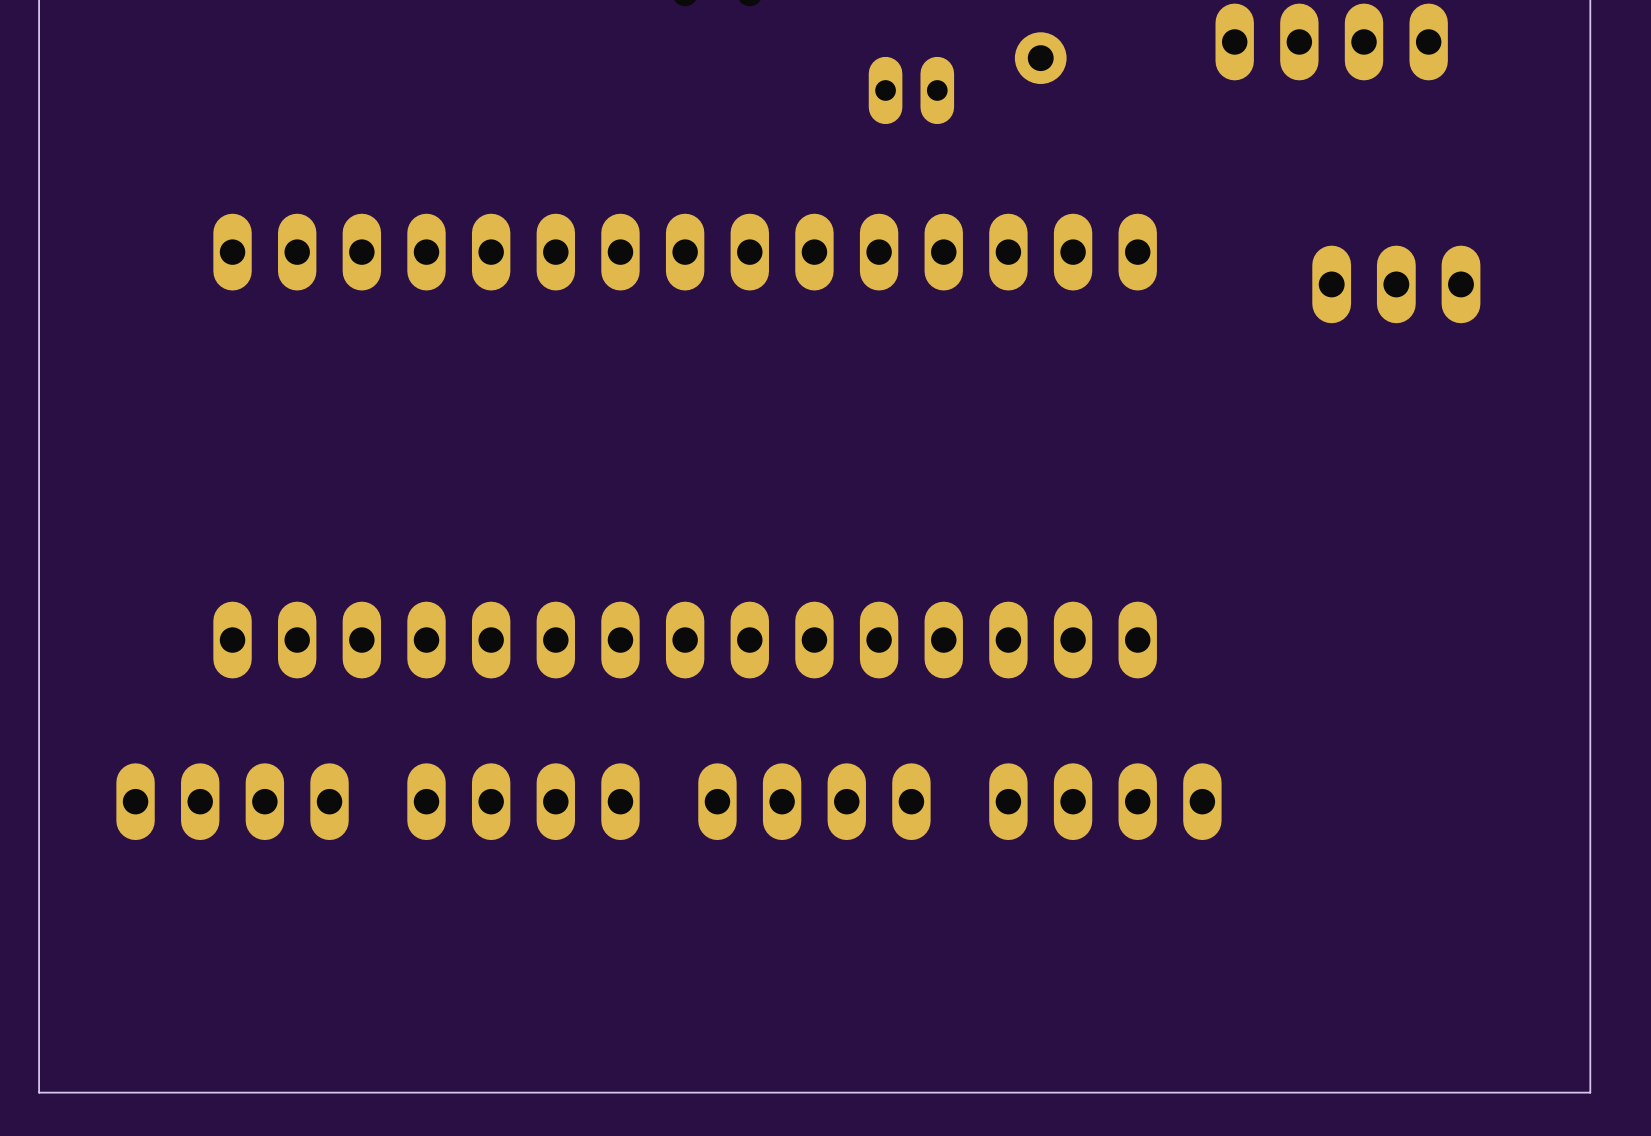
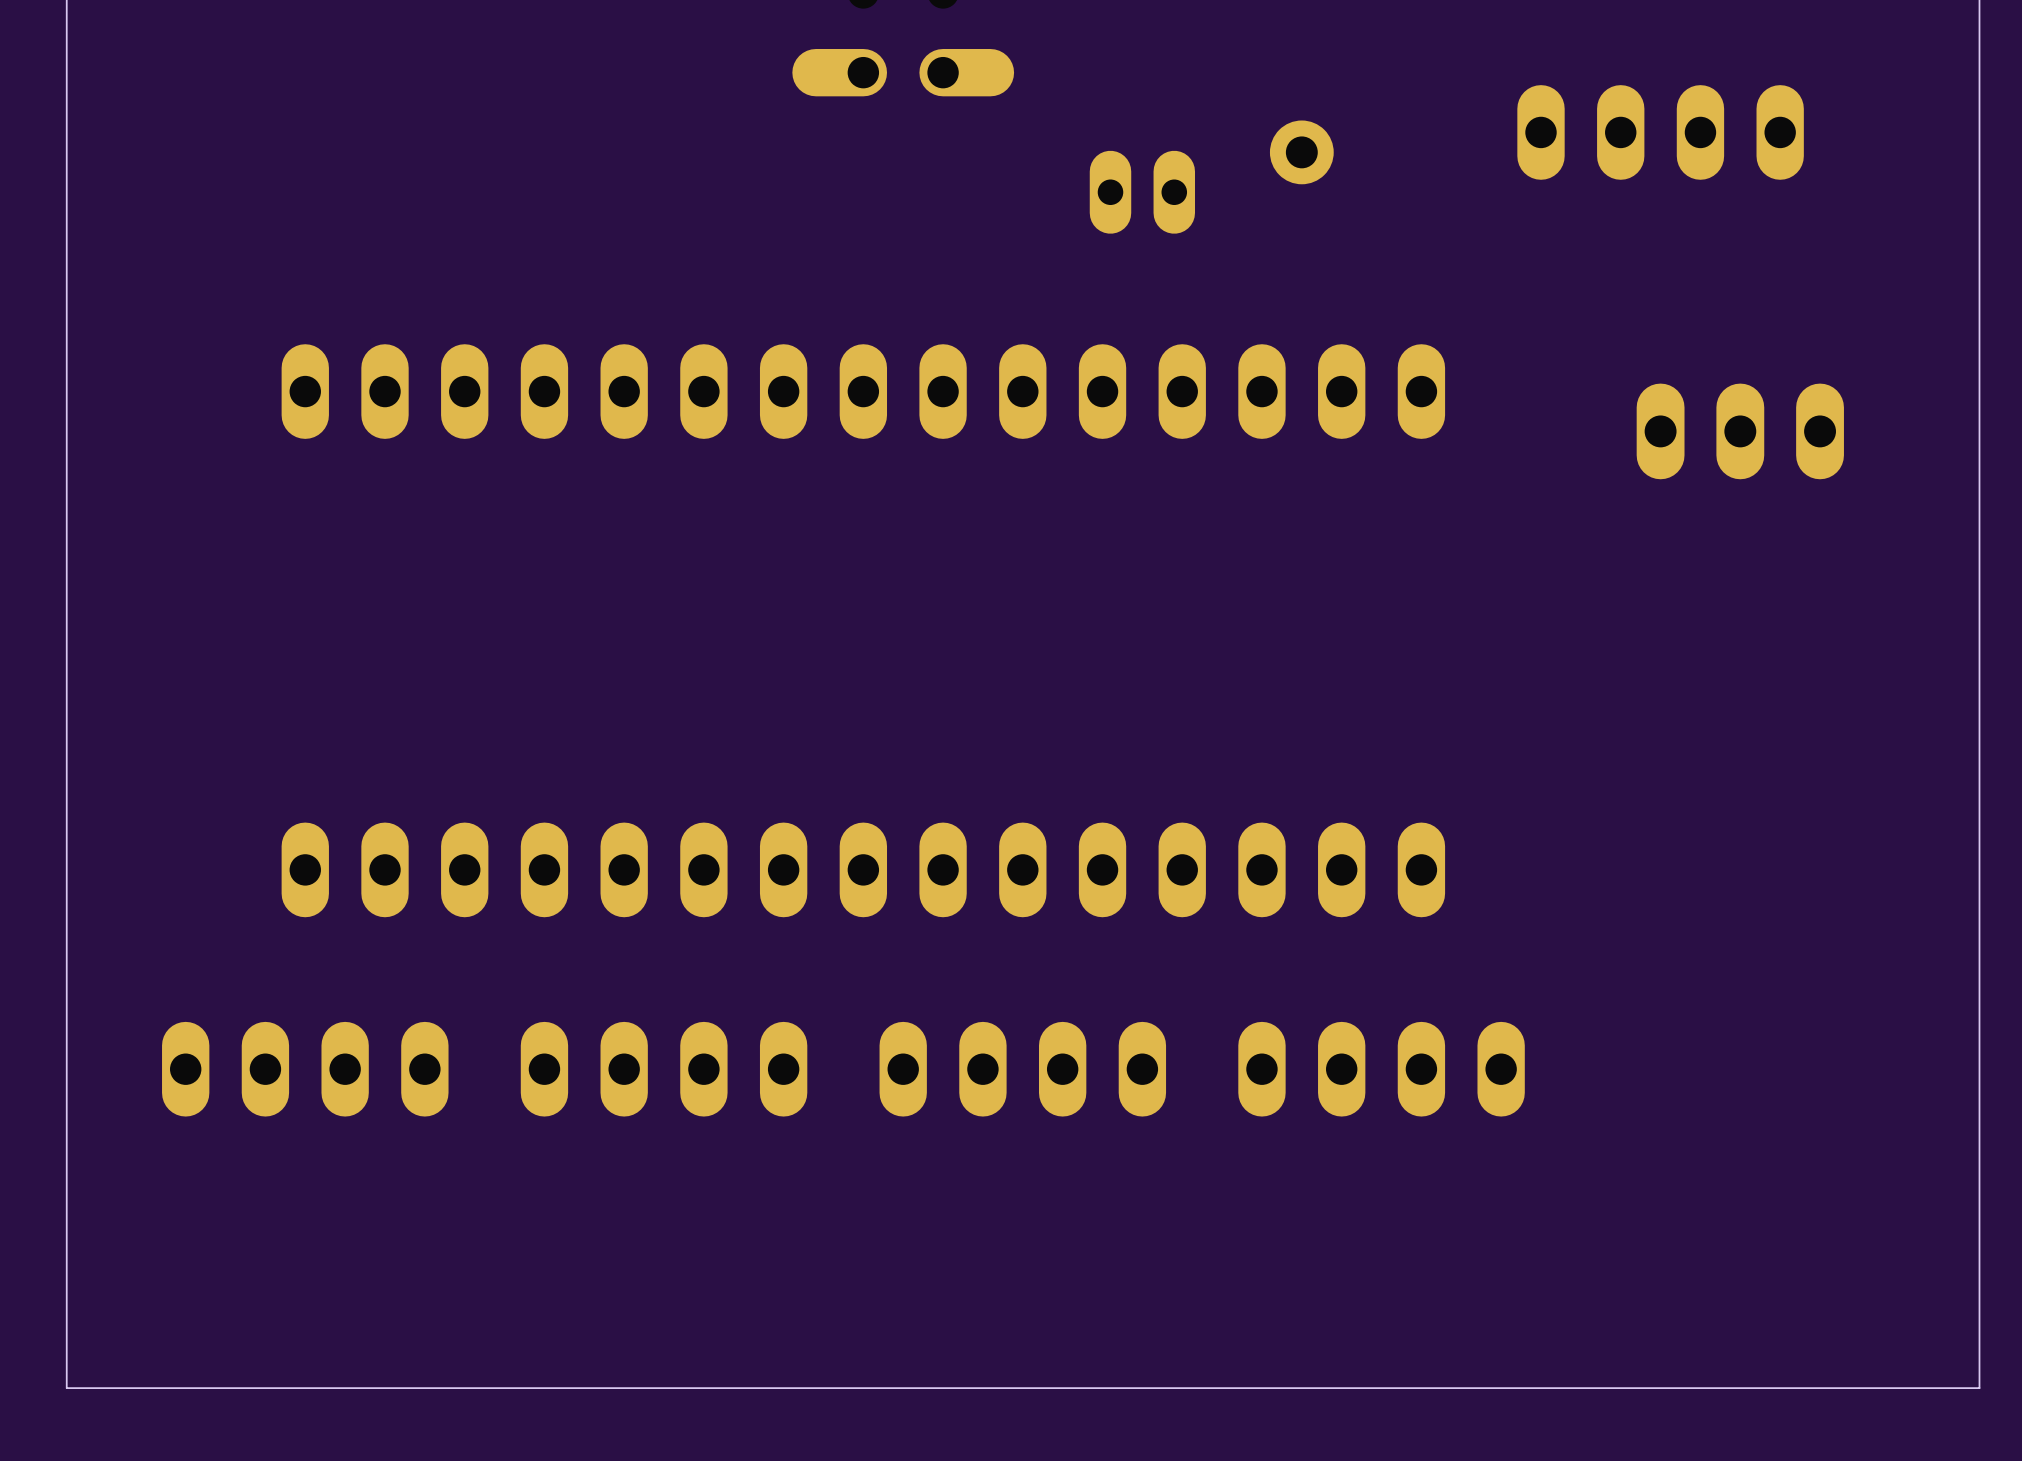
board edge: (1590, 1060) (1590, 1092) (39, 1092) (39, 1060) -> (1979, 1388) (66, 1388)

